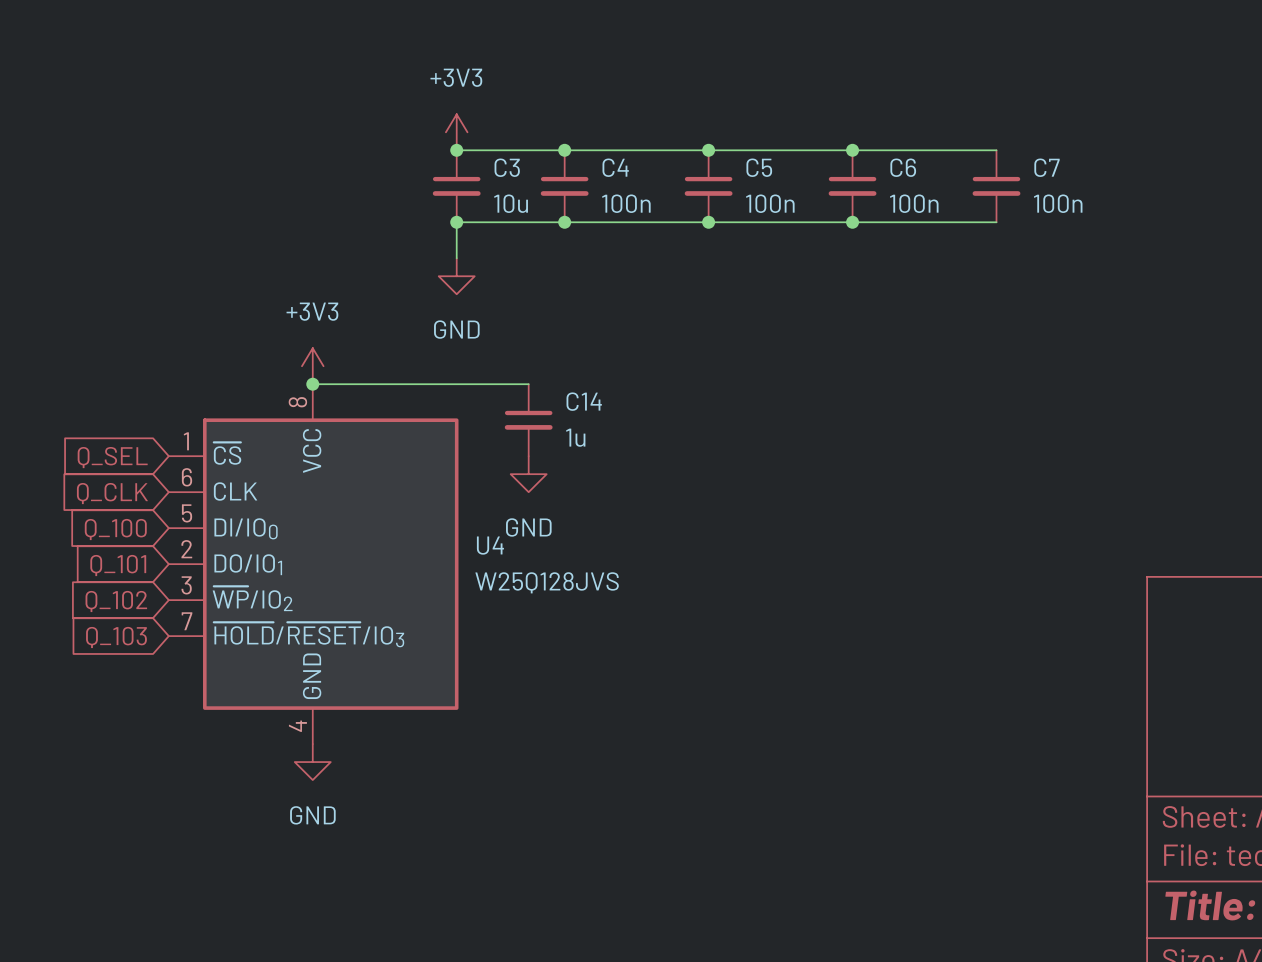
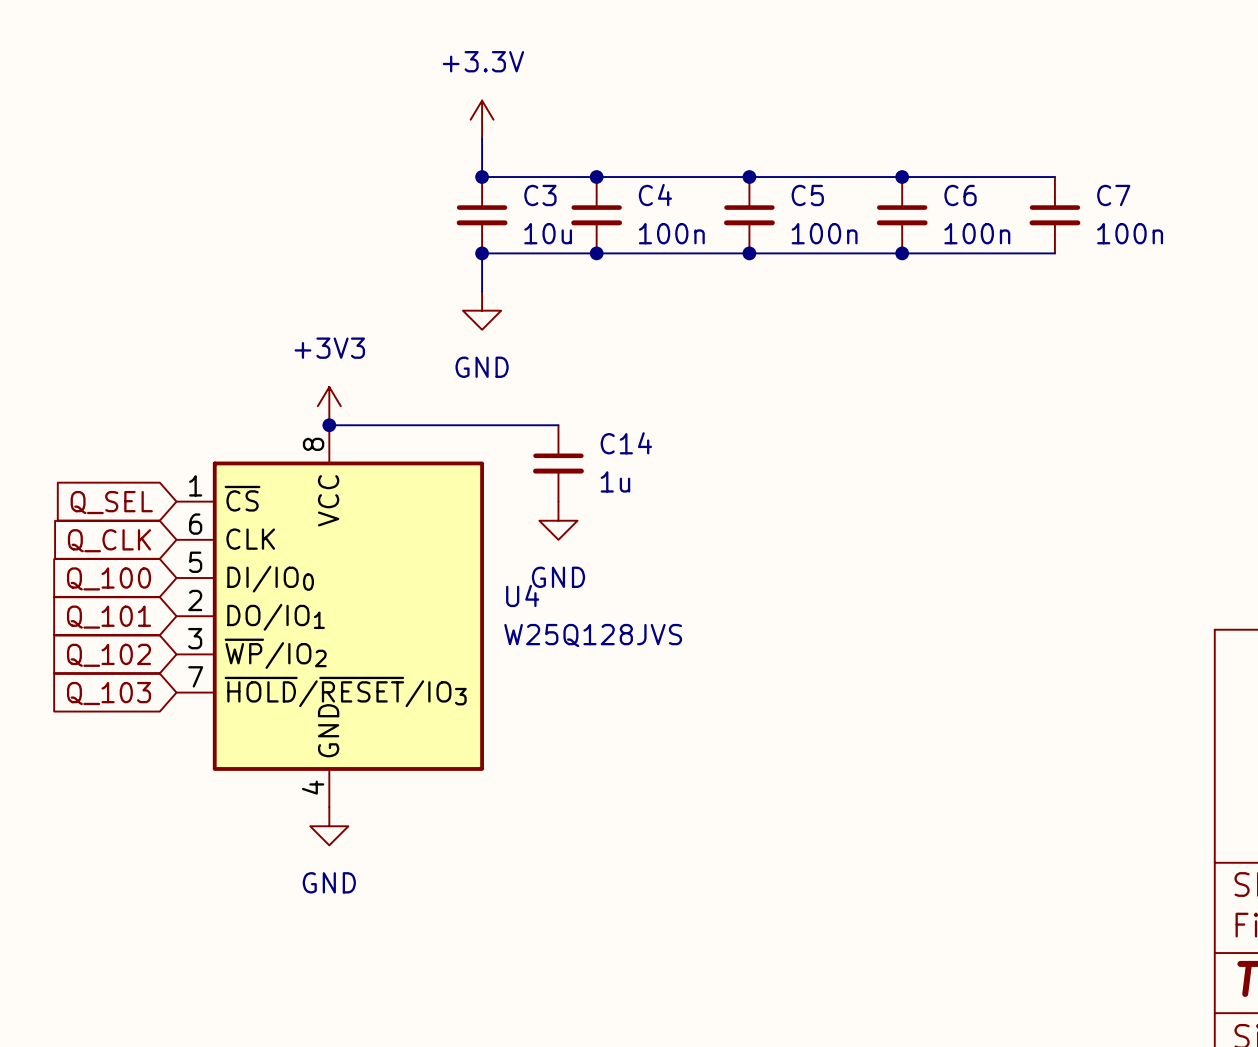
power symbol: none -> +3.3V (482, 119)
power symbol: +3V3 (456, 132) -> none

